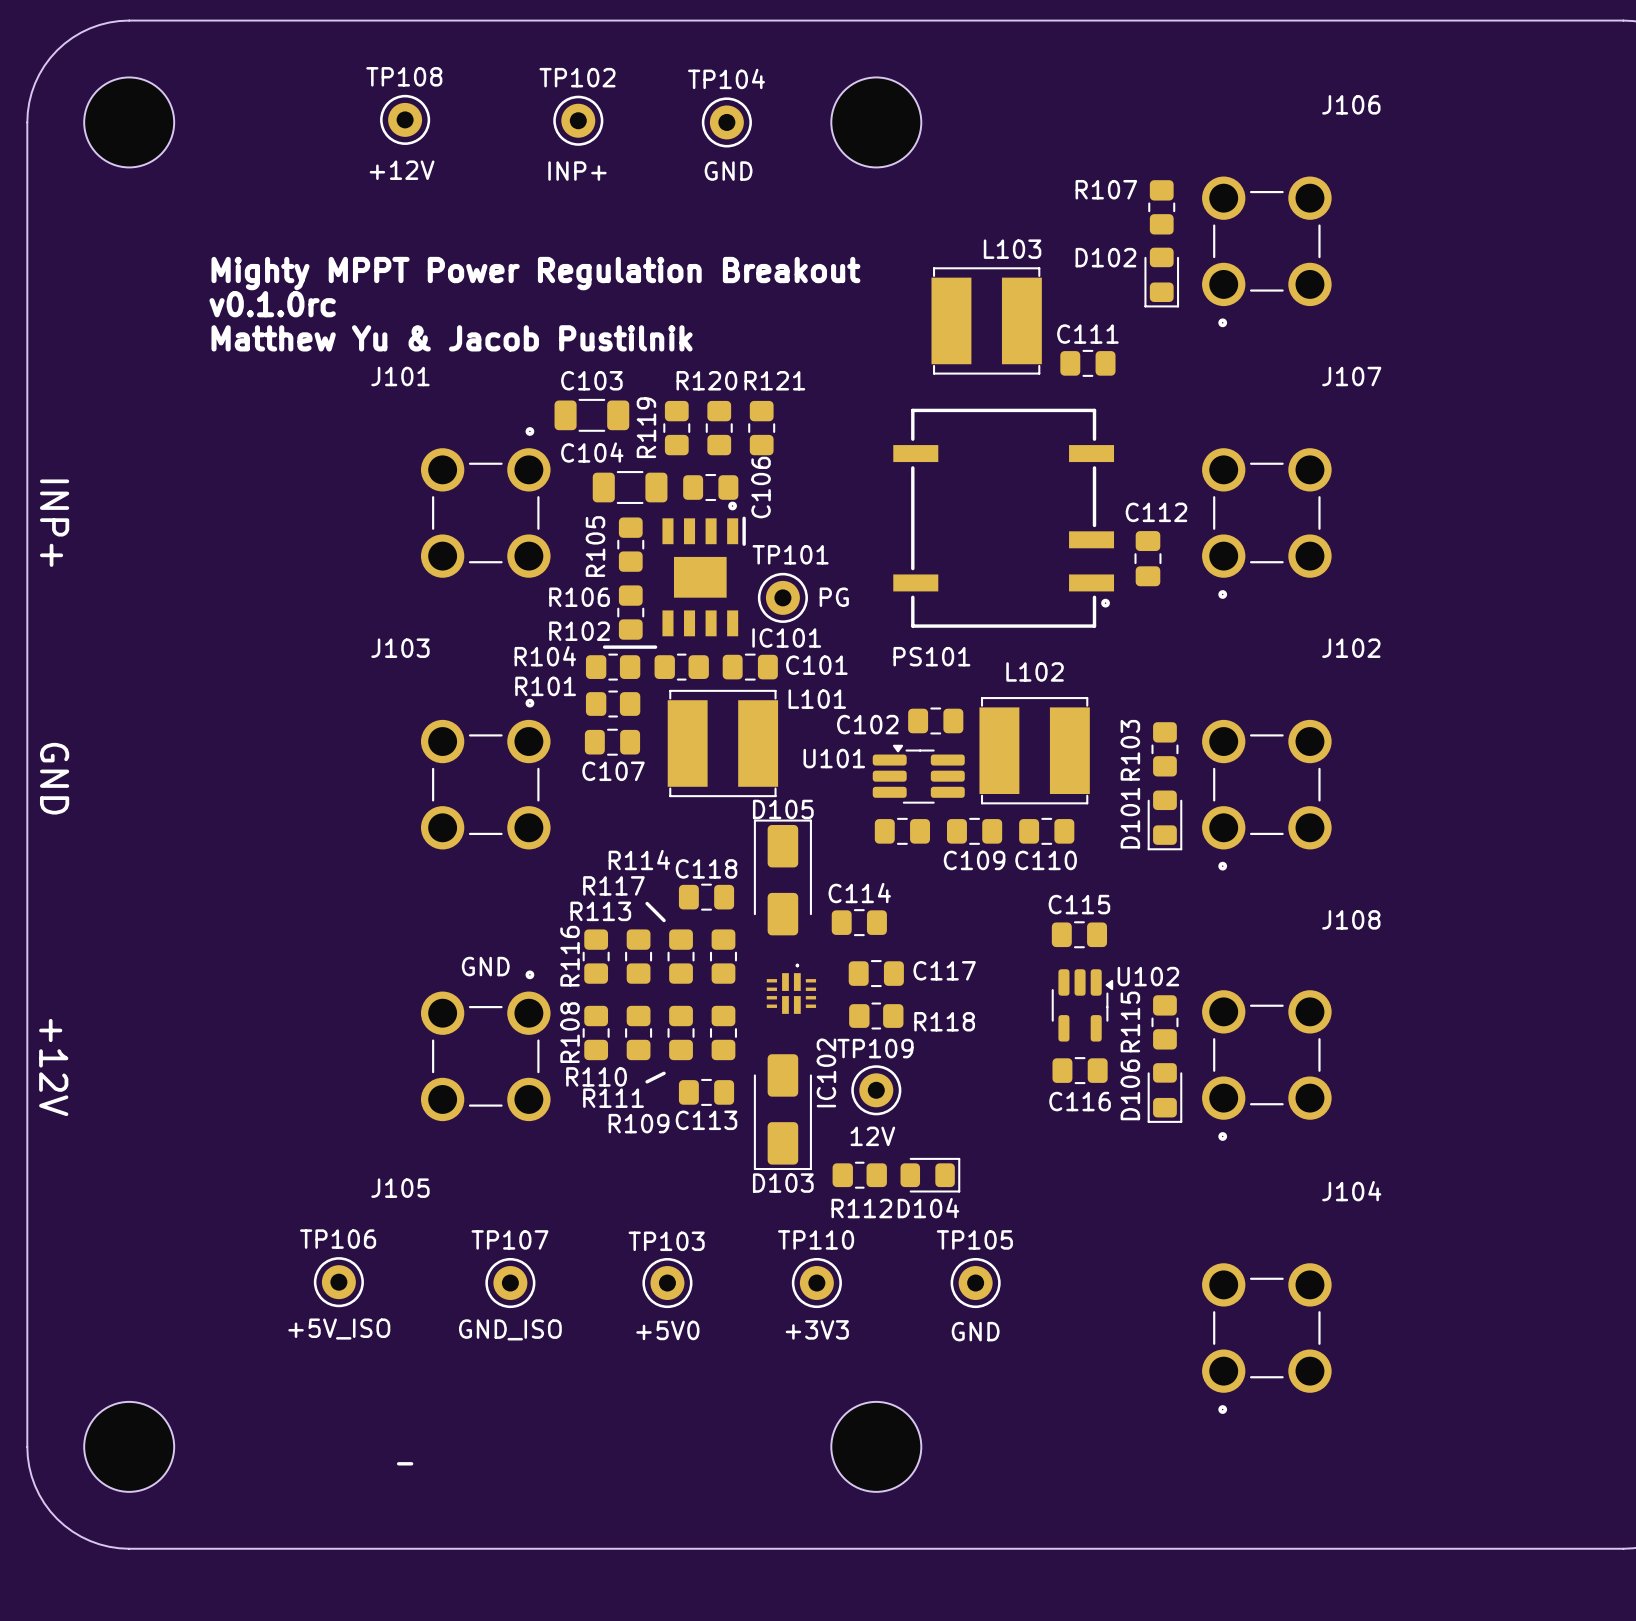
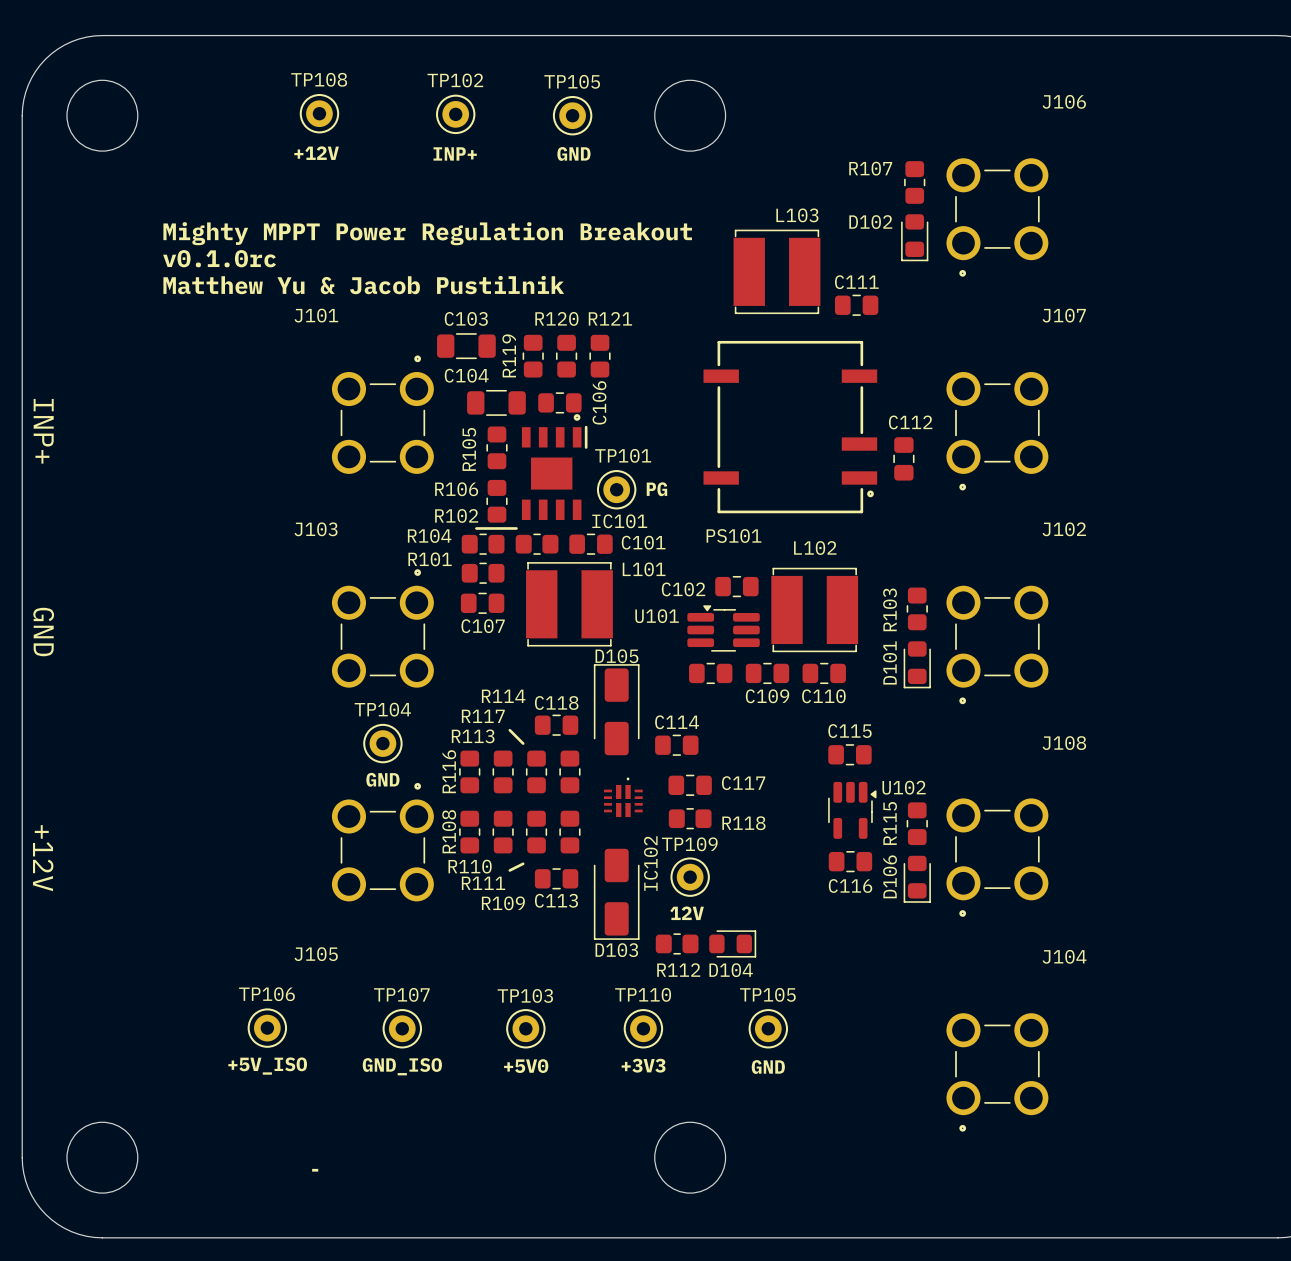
TP104 name: TP104 (726, 78) -> TP105 (572, 81)
TP104: none -> (382, 743)

